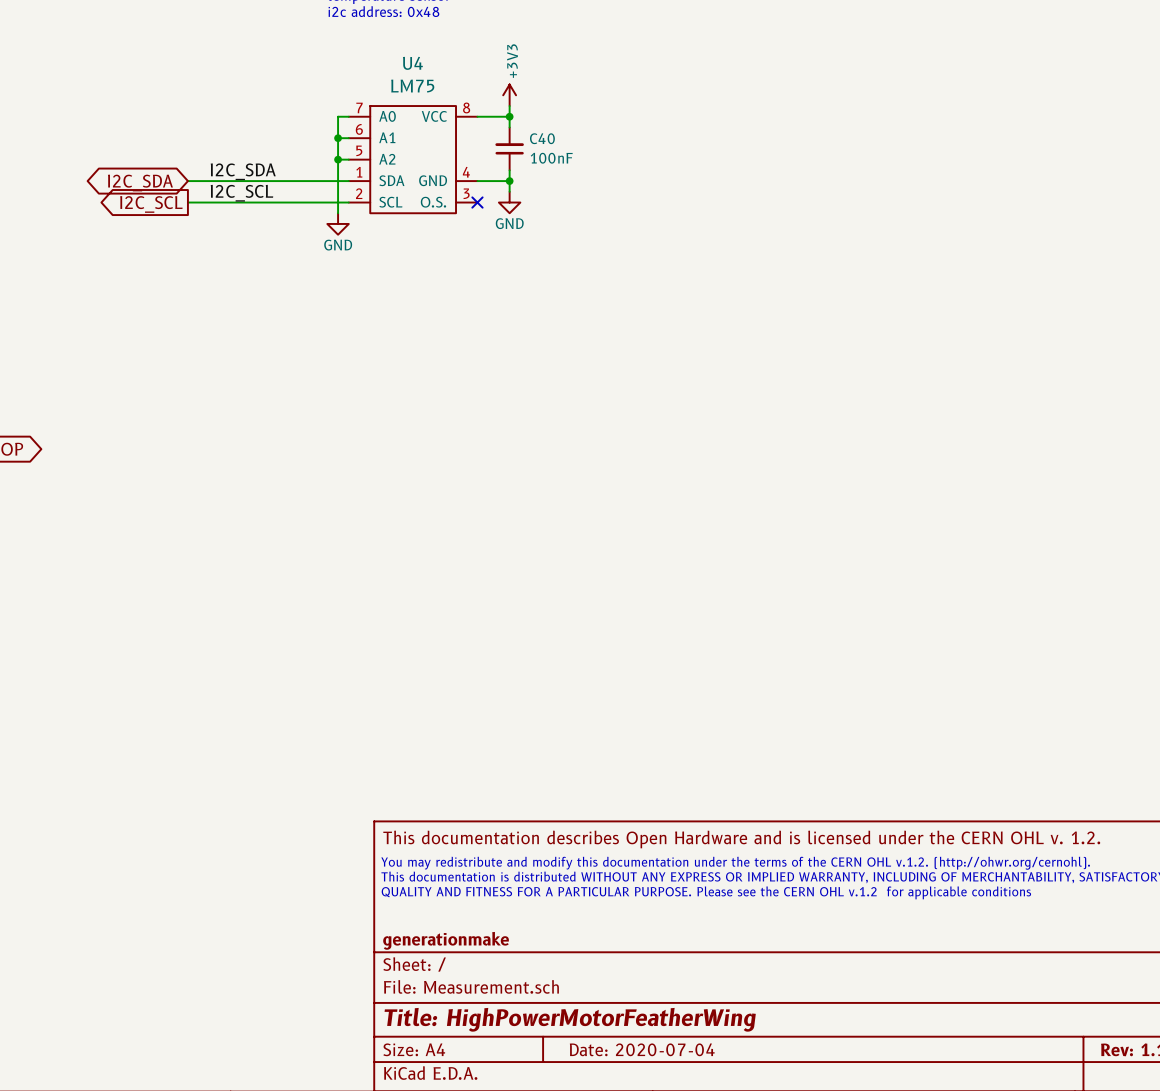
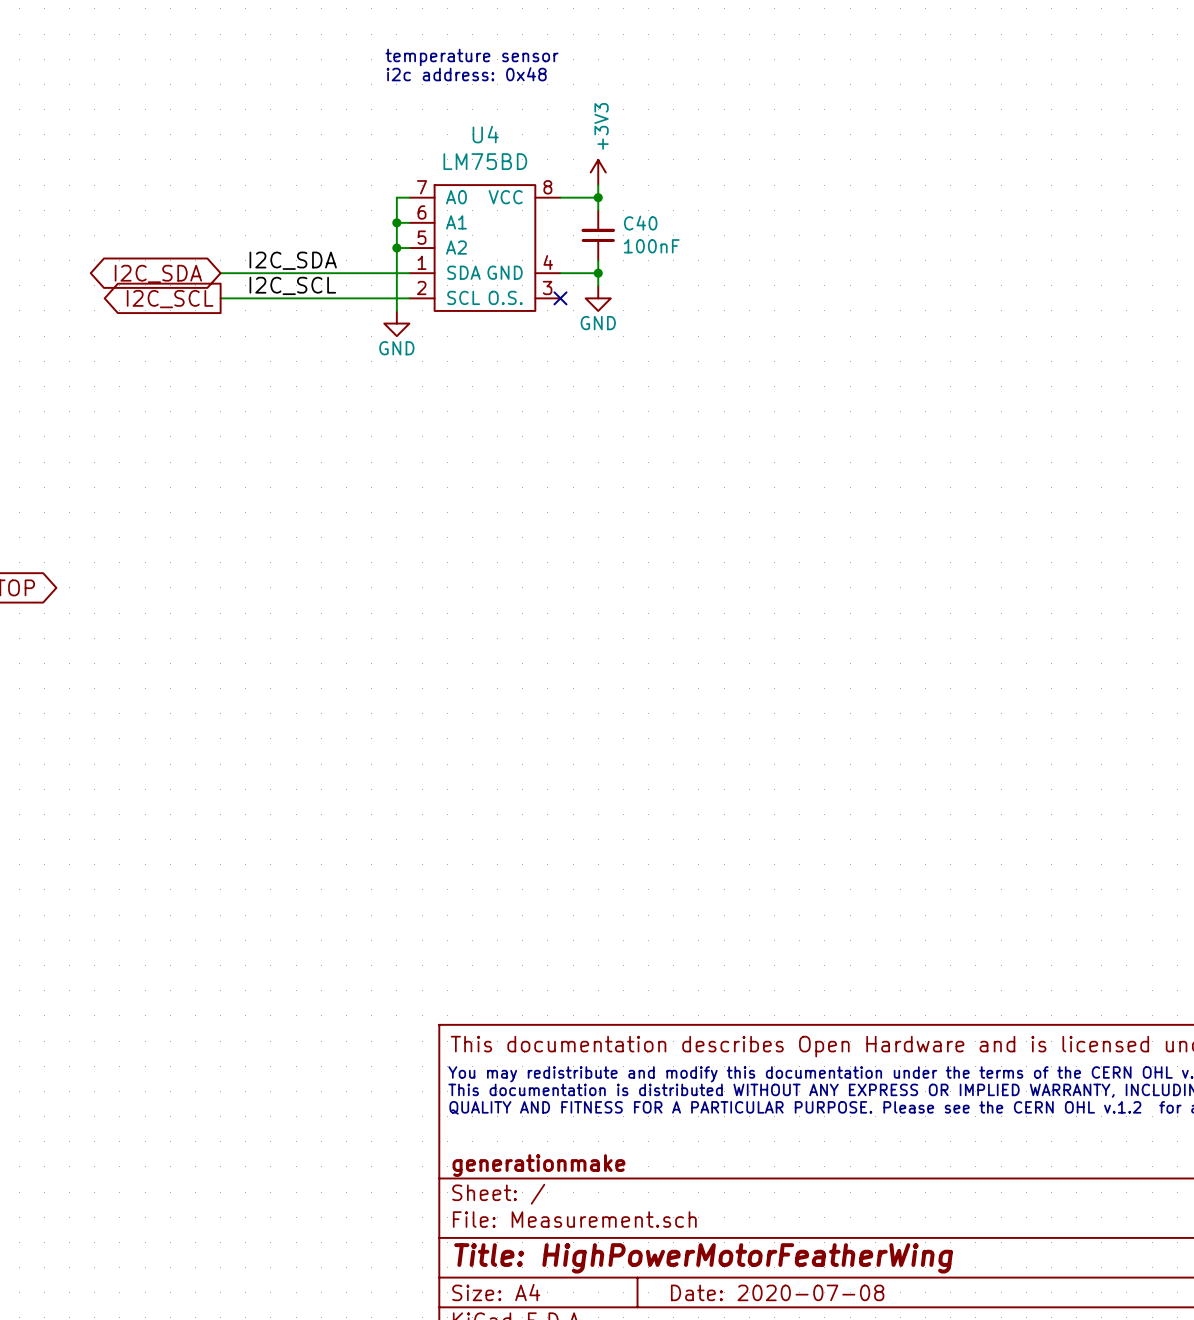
U4 value: LM75 (412, 86) -> LM75BD (485, 161)
title block: Date: 2020-07-04 (642, 1049) -> Date: 2020-07-08 (777, 1292)

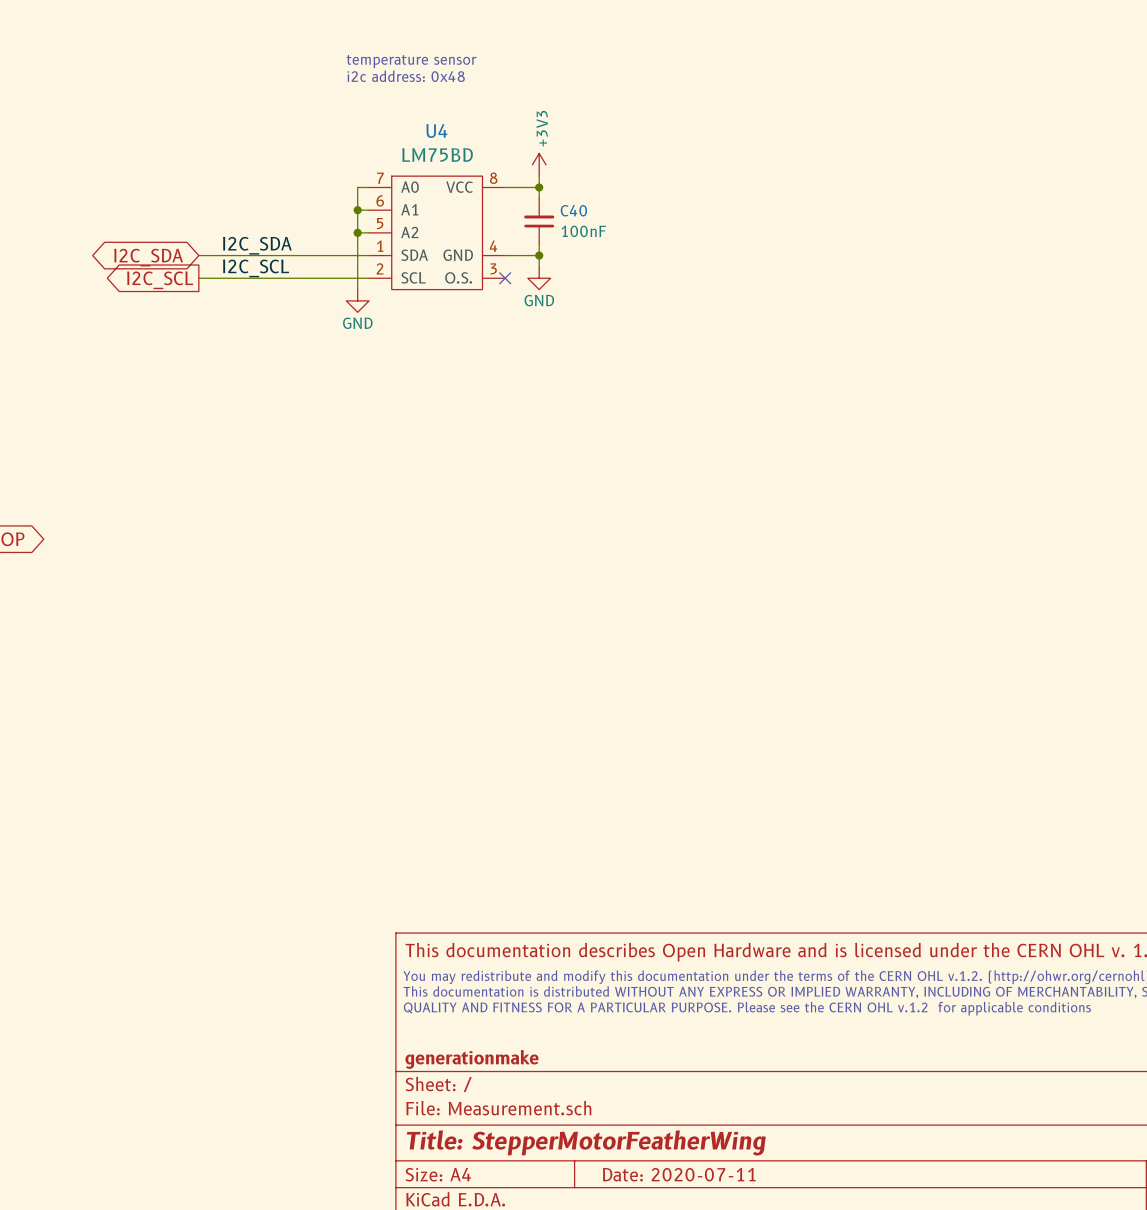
title block: Title: HighPowerMotorFeatherWing (703, 1258) -> Title: StepperMotorFeatherWing (586, 1142)
title block: Date: 2020-07-08 (777, 1292) -> Date: 2020-07-11 (679, 1174)

